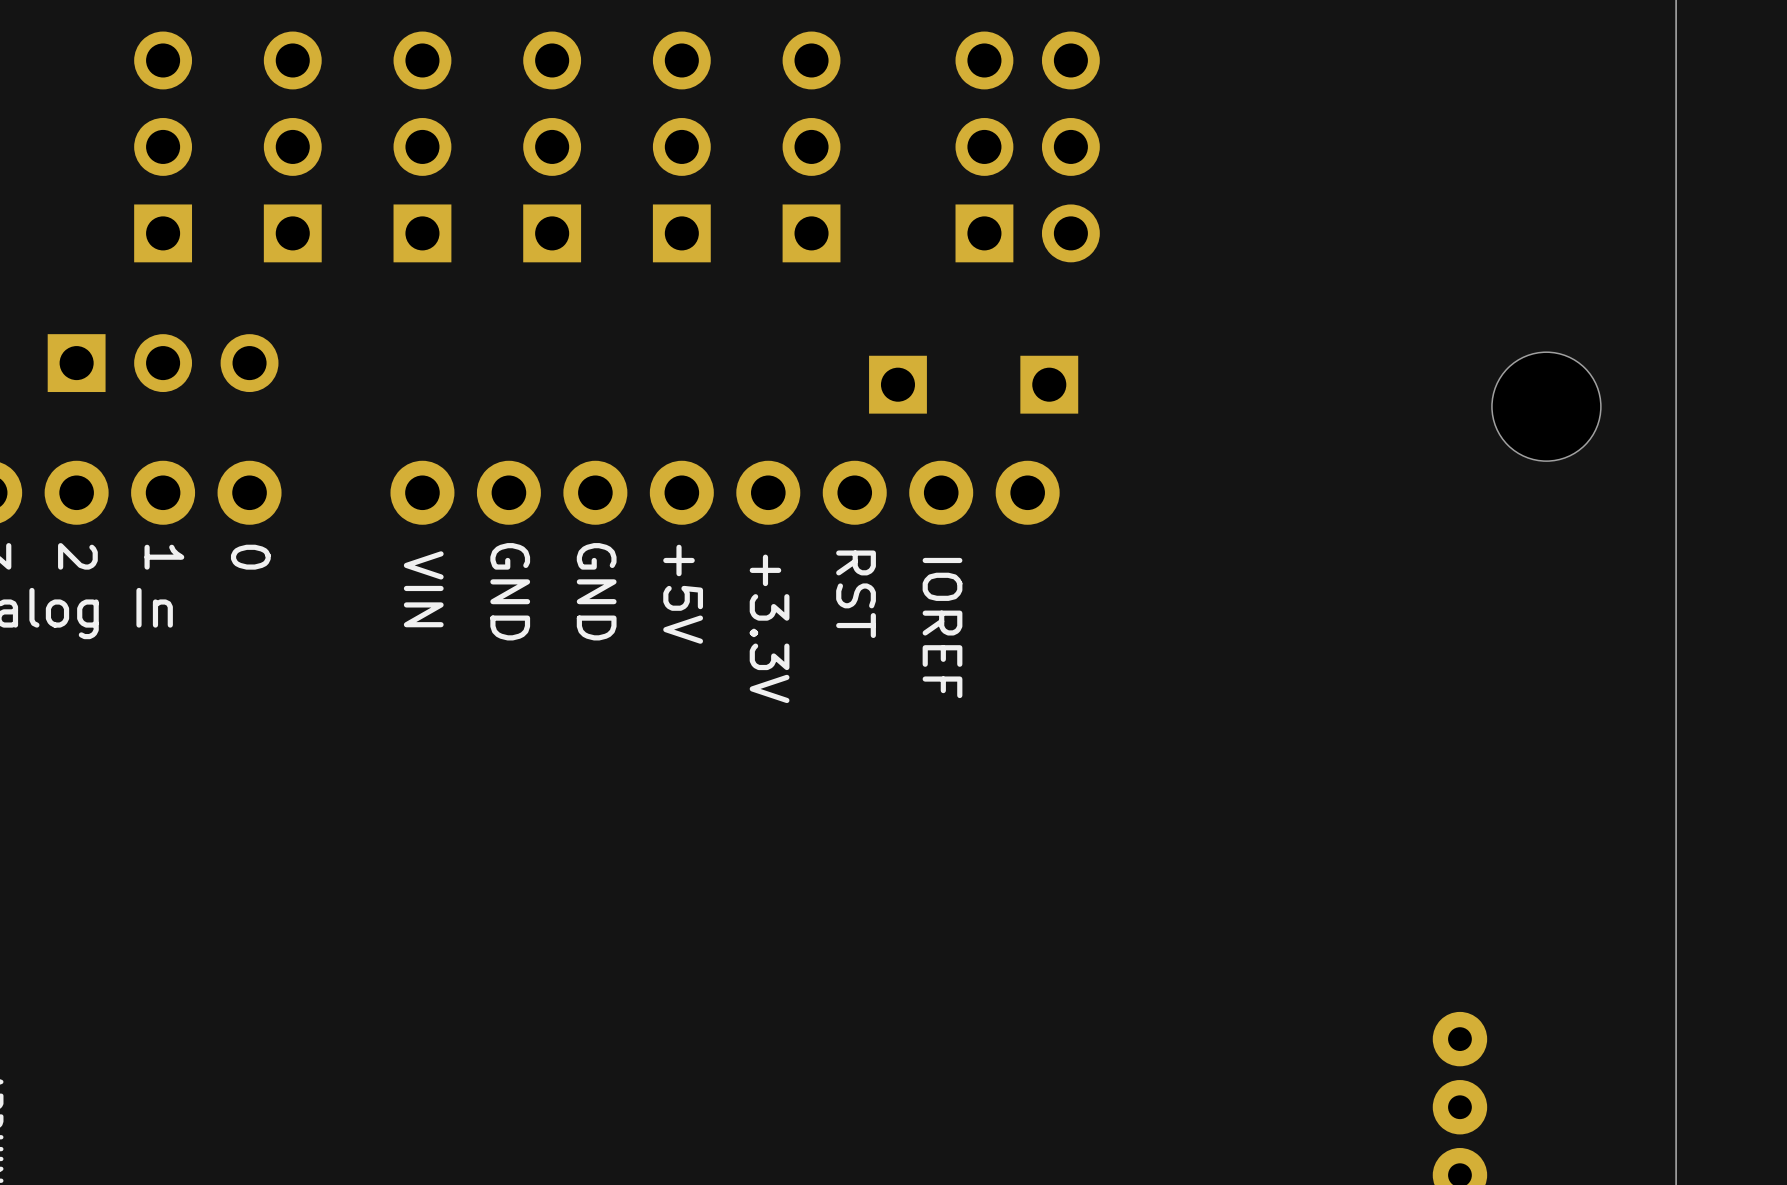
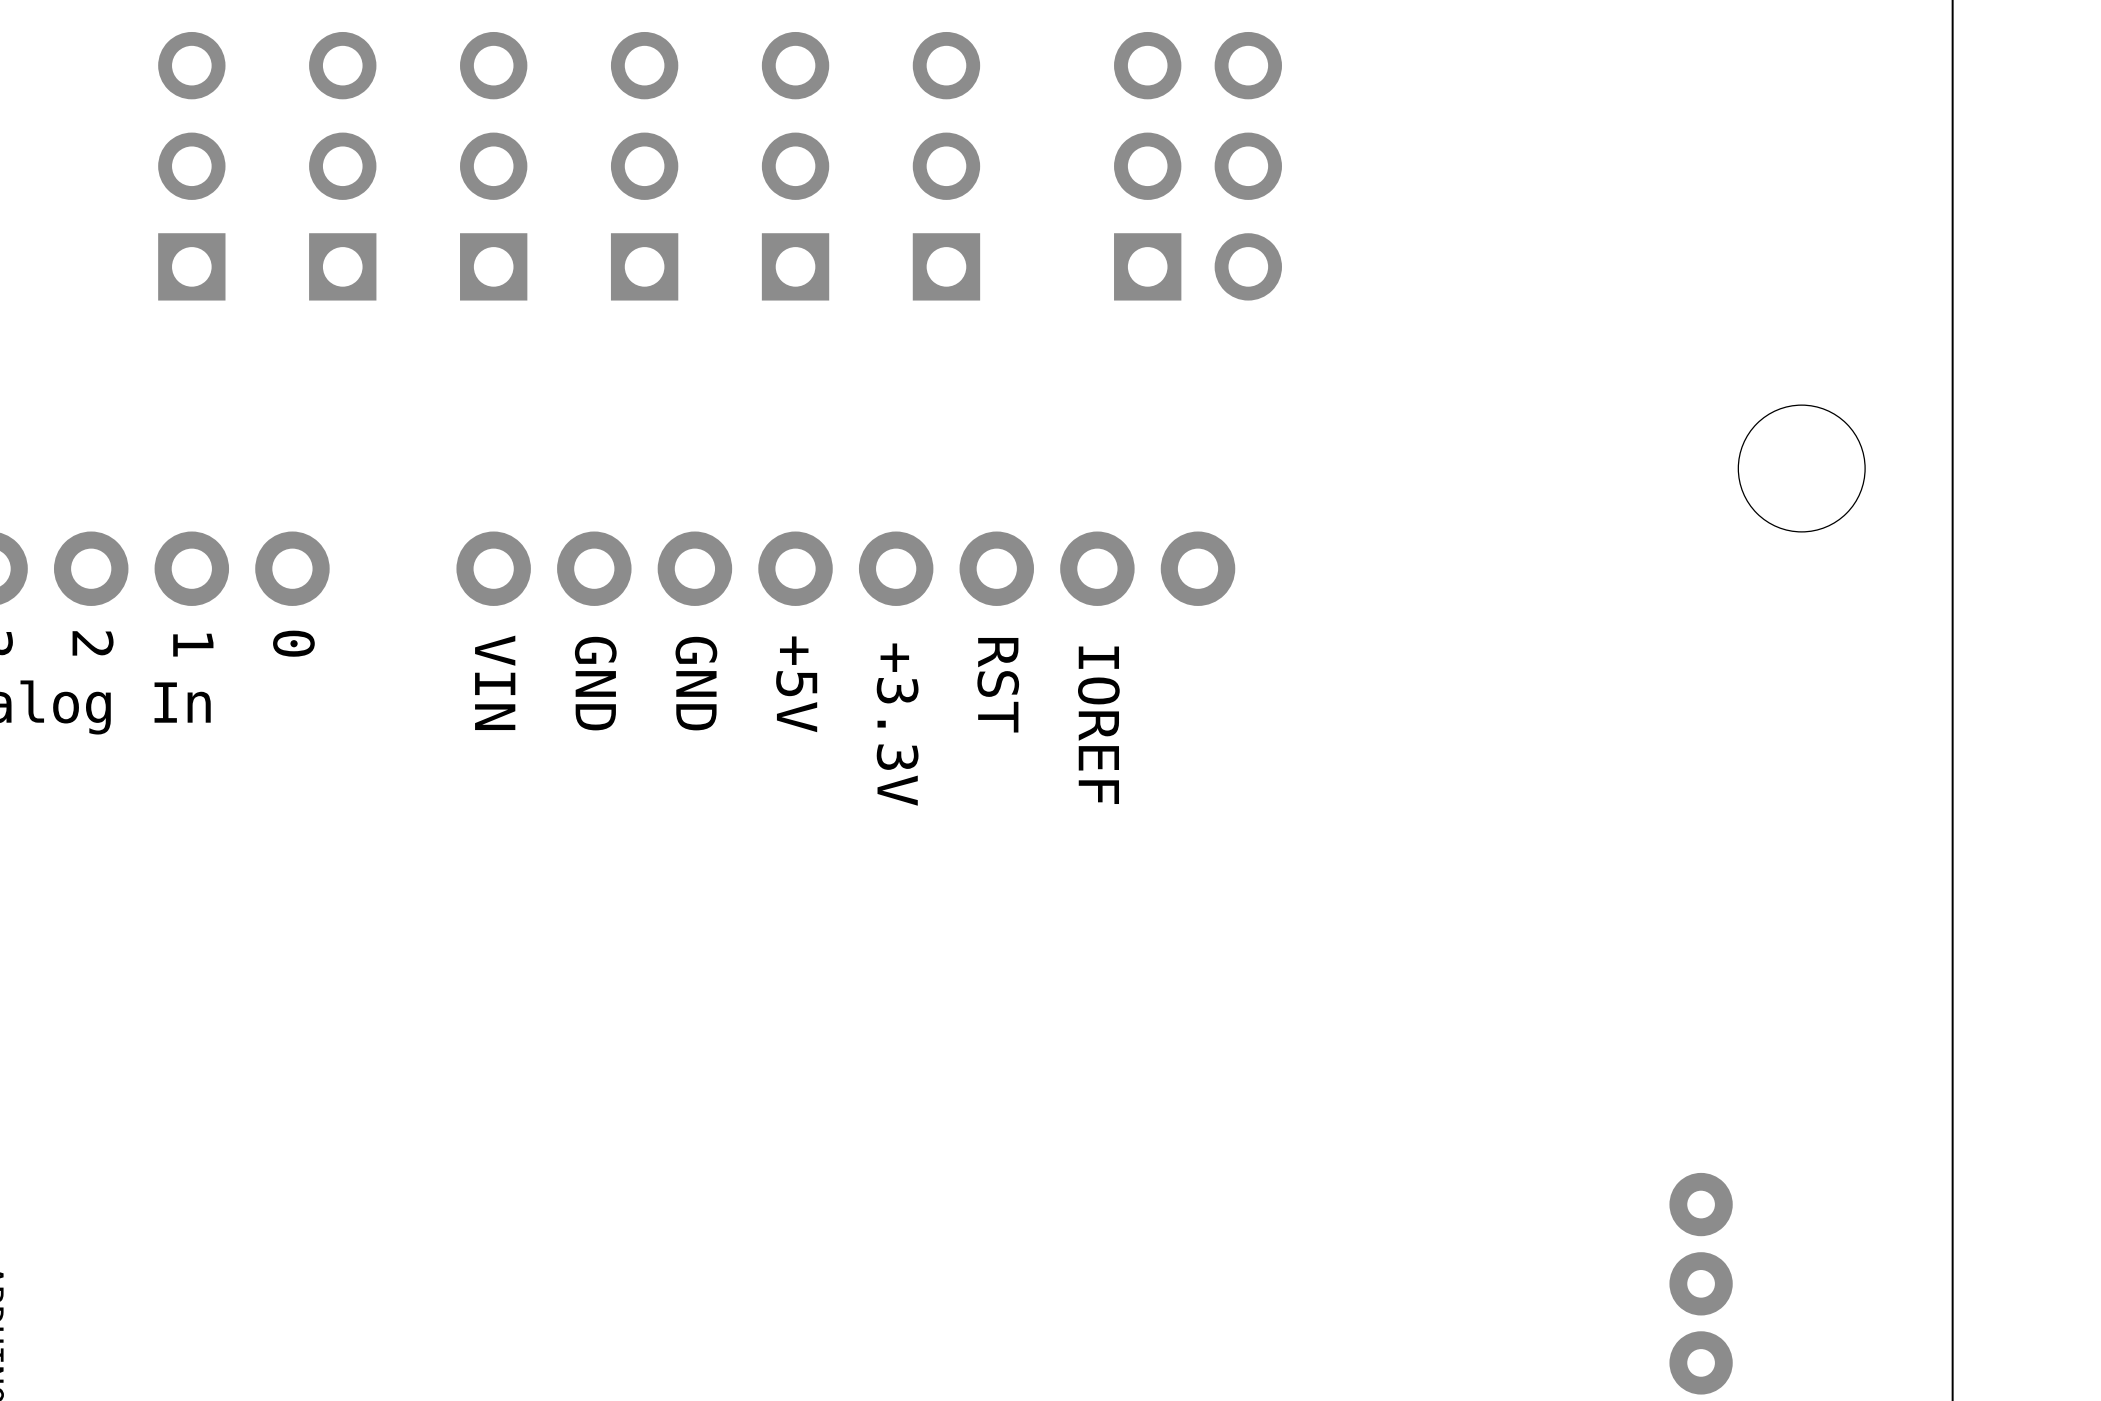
part: (163, 363) -> none
part: (897, 384) -> none
part: (1049, 384) -> none

